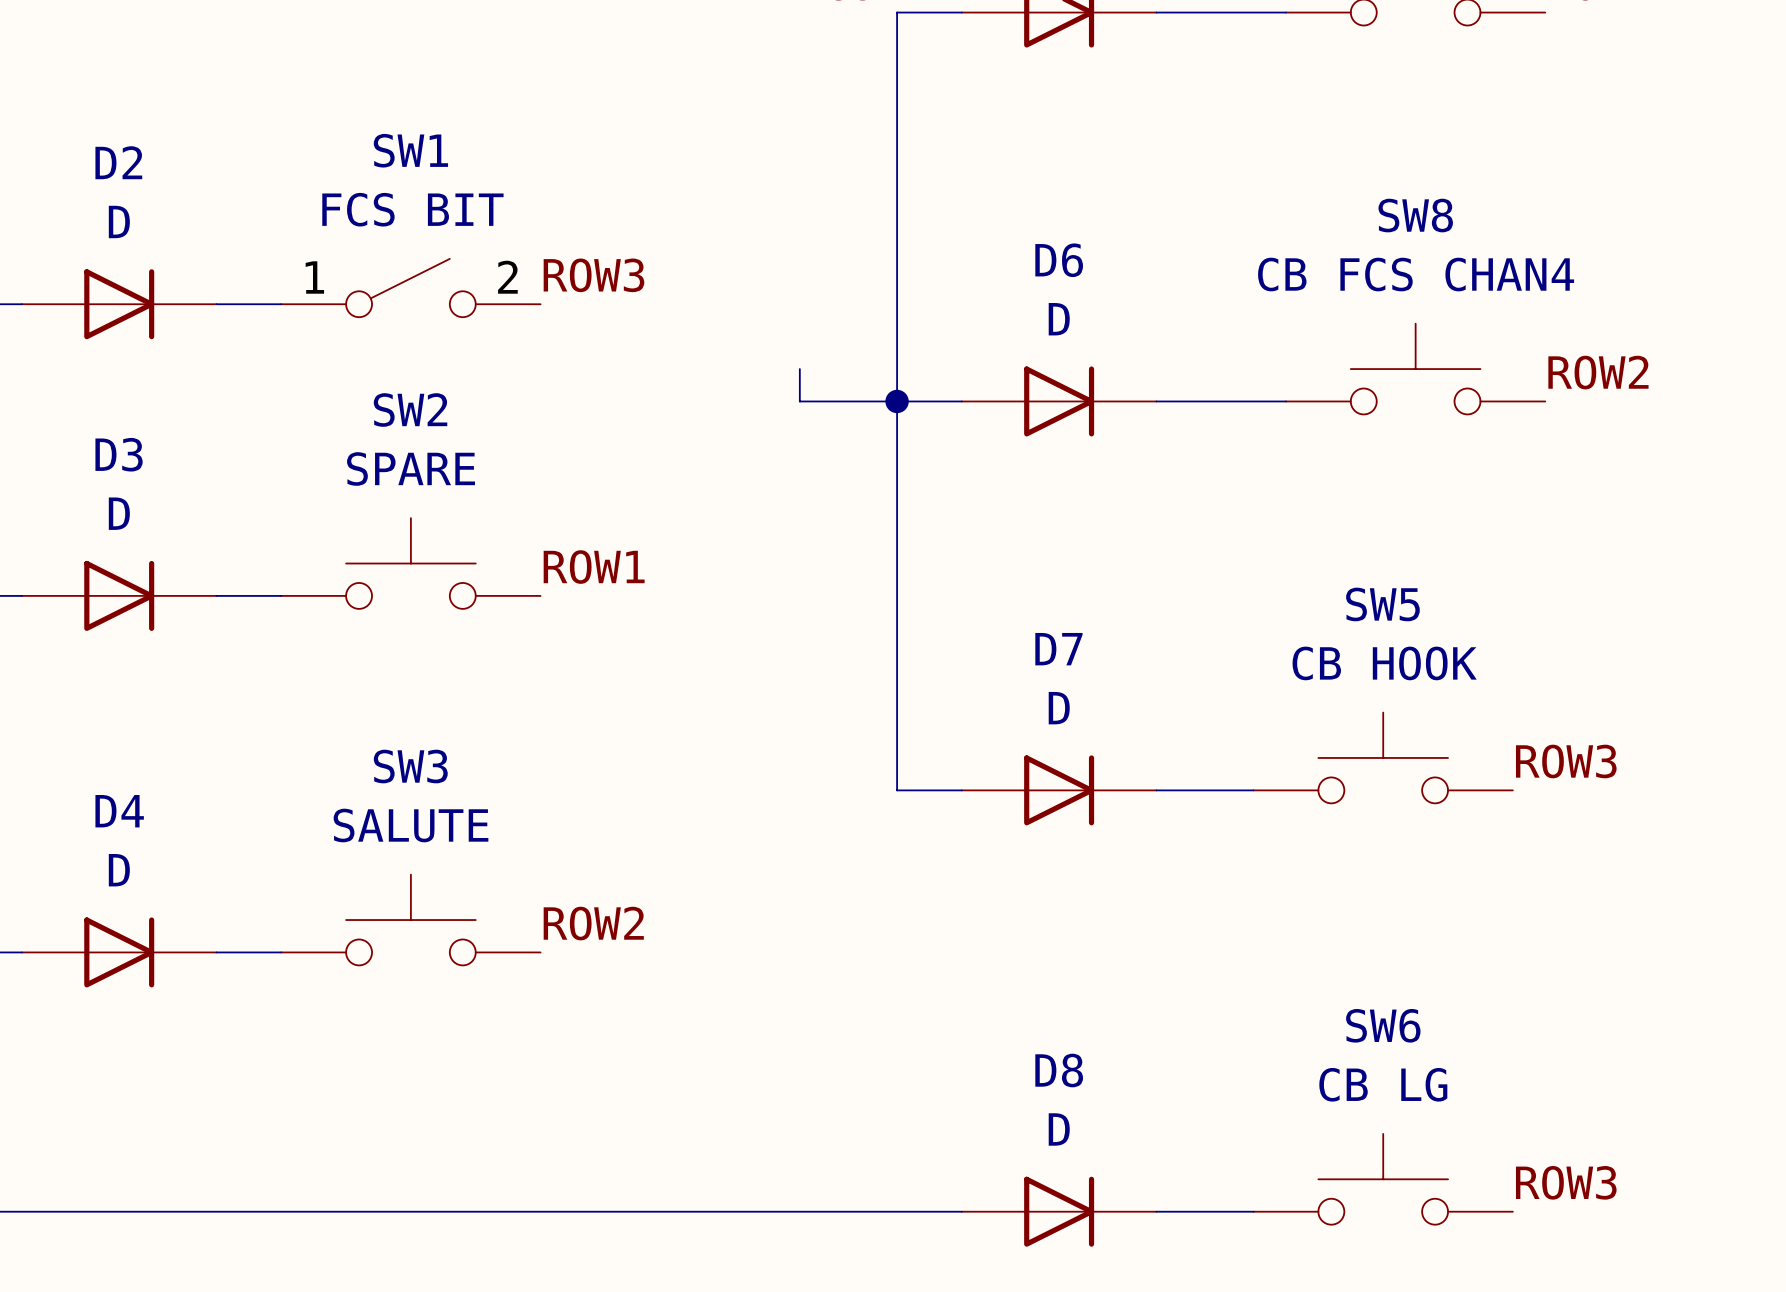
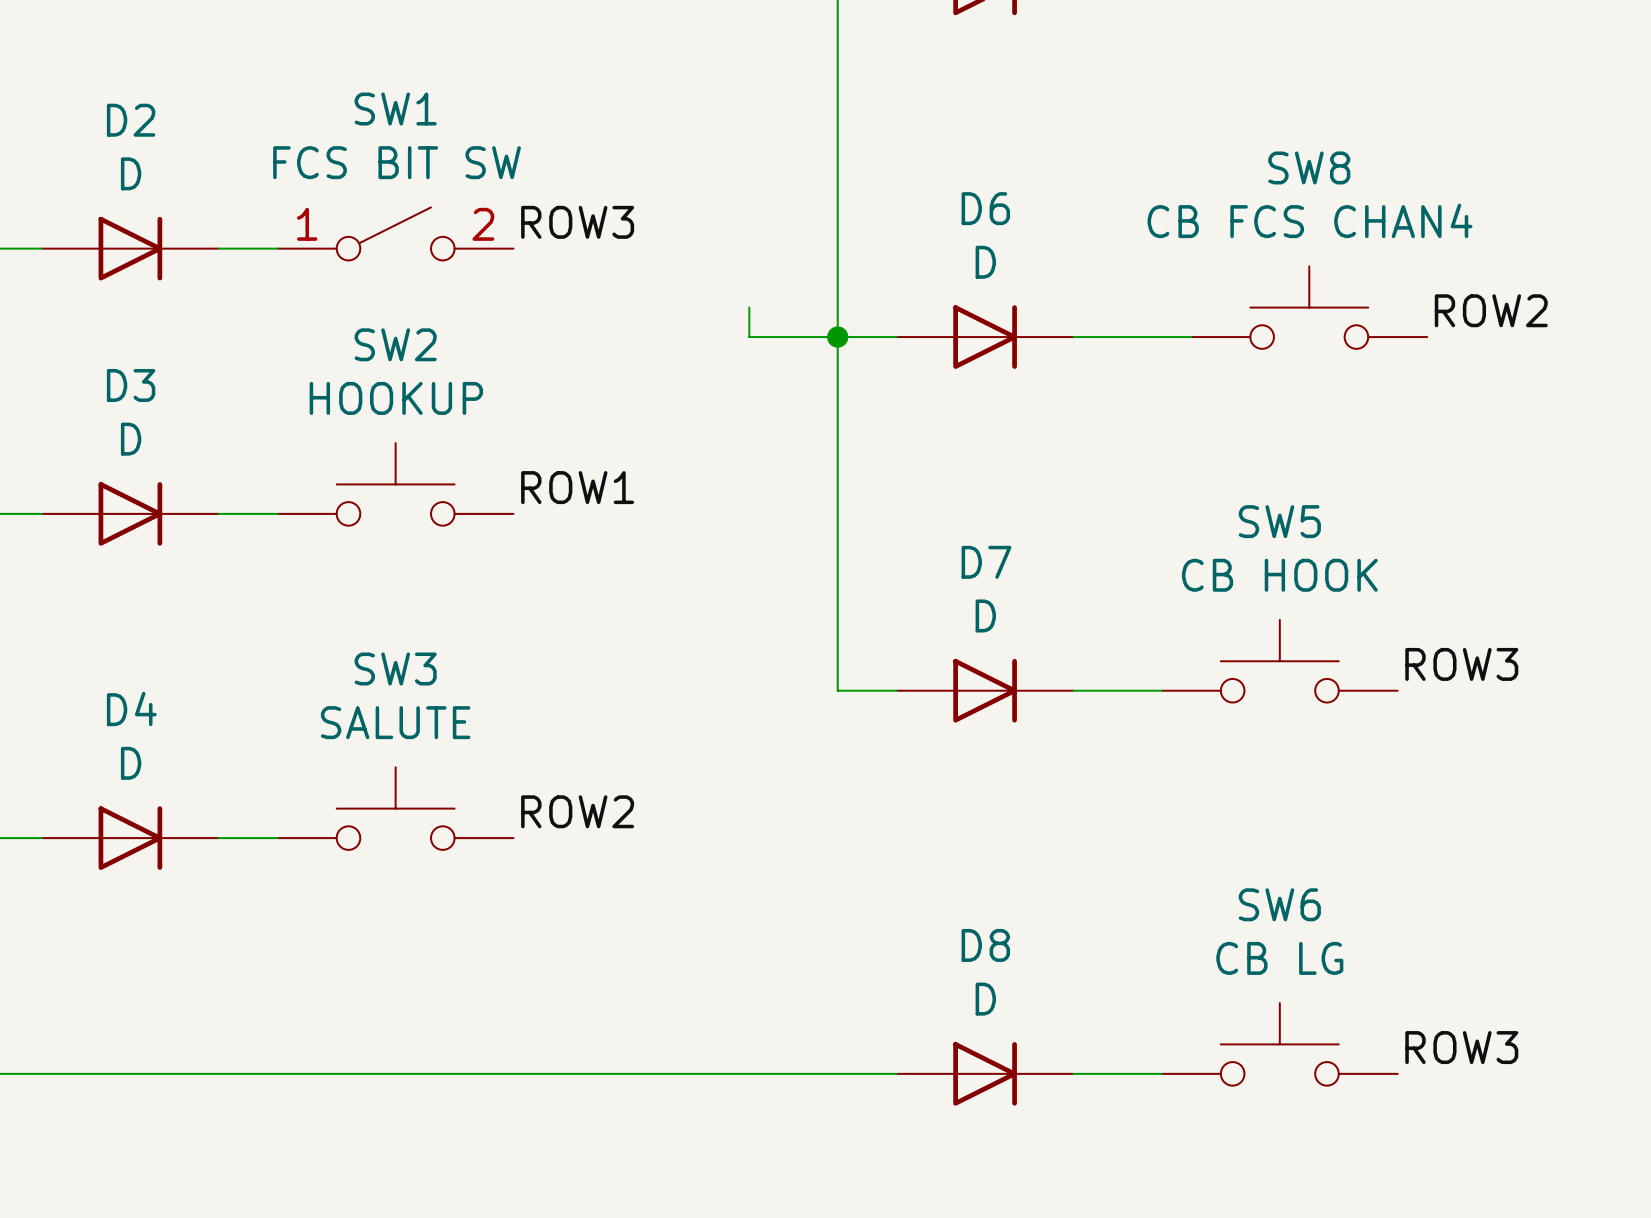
SW1 value: FCS BIT (412, 209) -> FCS BIT SW (397, 162)
SW2 value: SPARE (411, 468) -> HOOKUP (396, 398)

